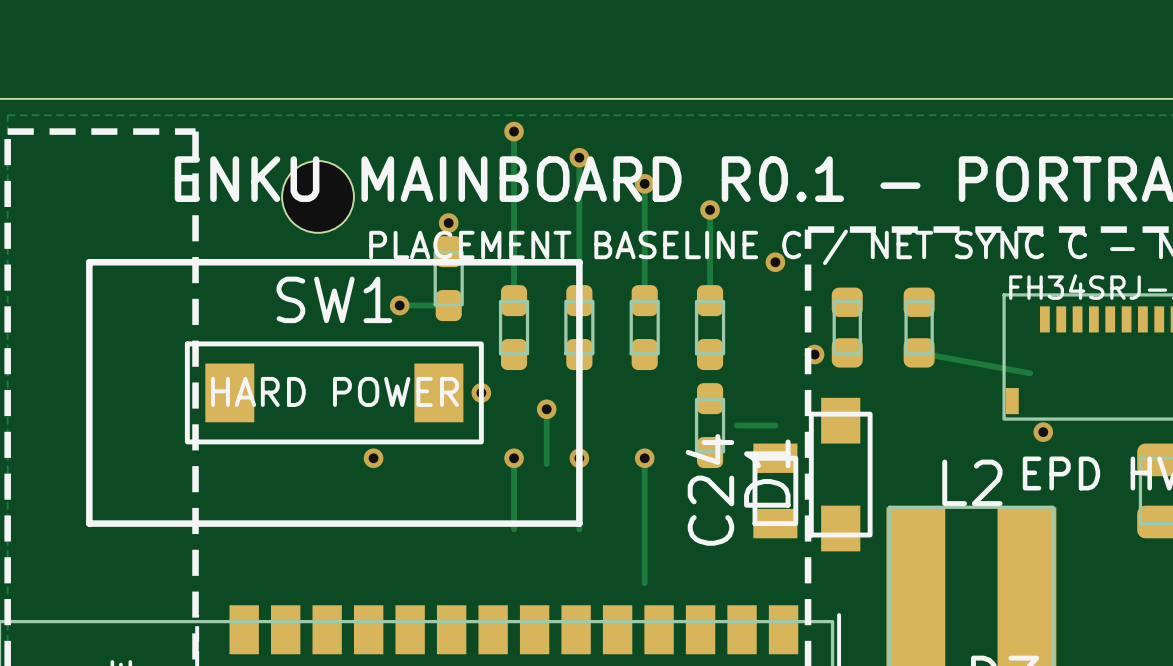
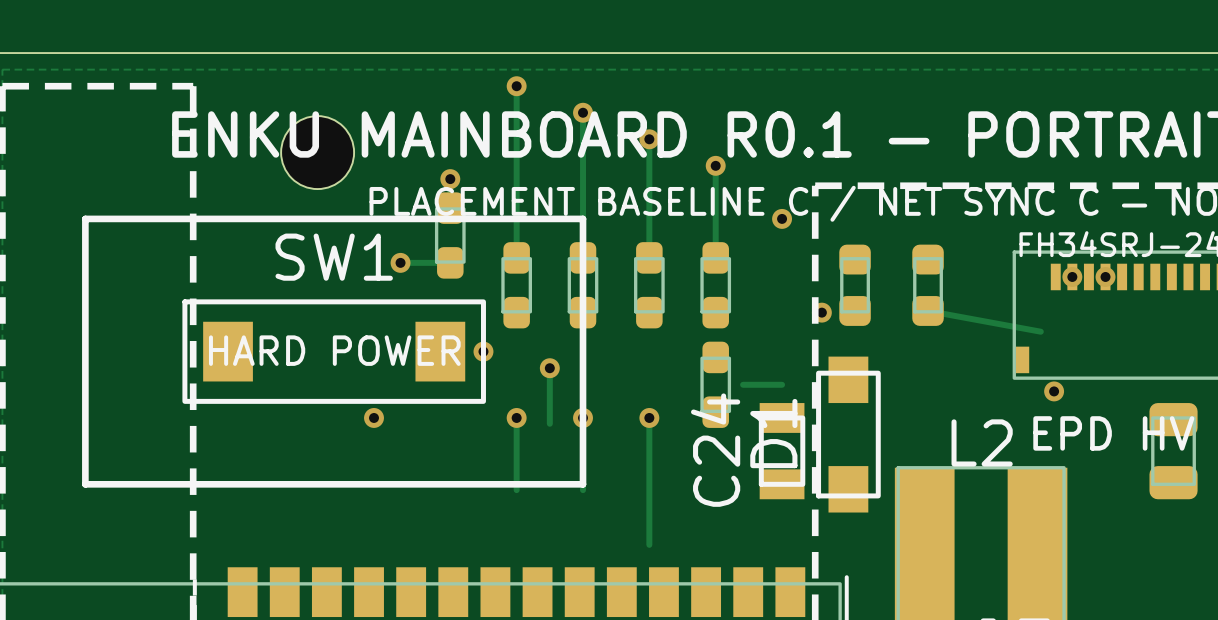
via: none -> (1072, 276)
via: none -> (1105, 276)

